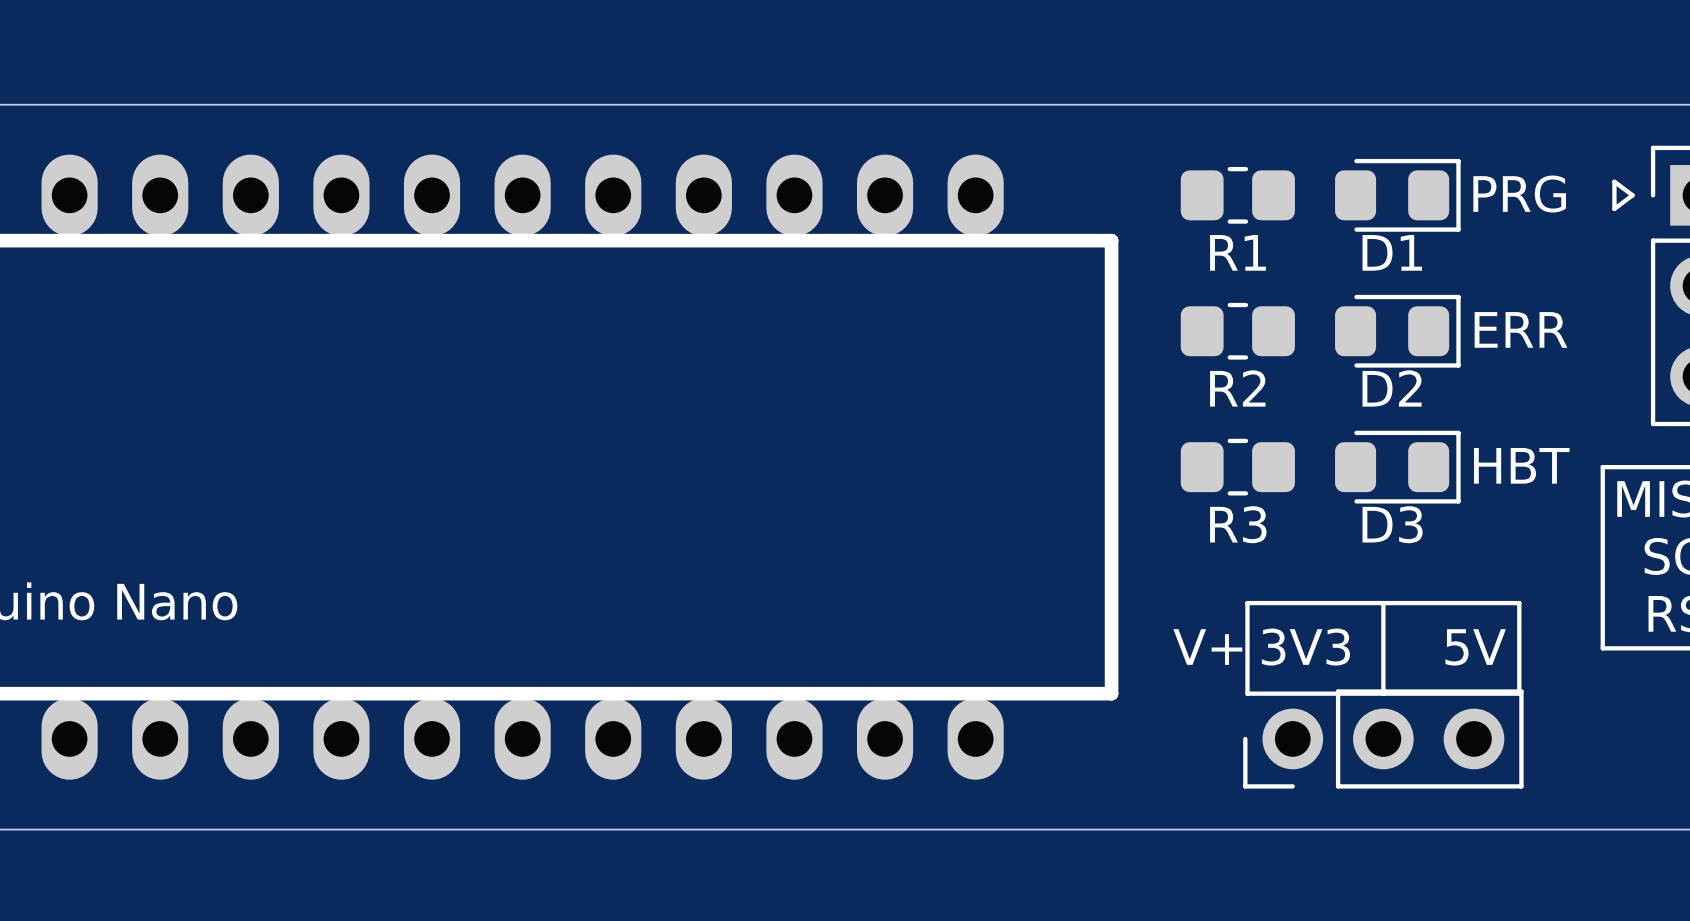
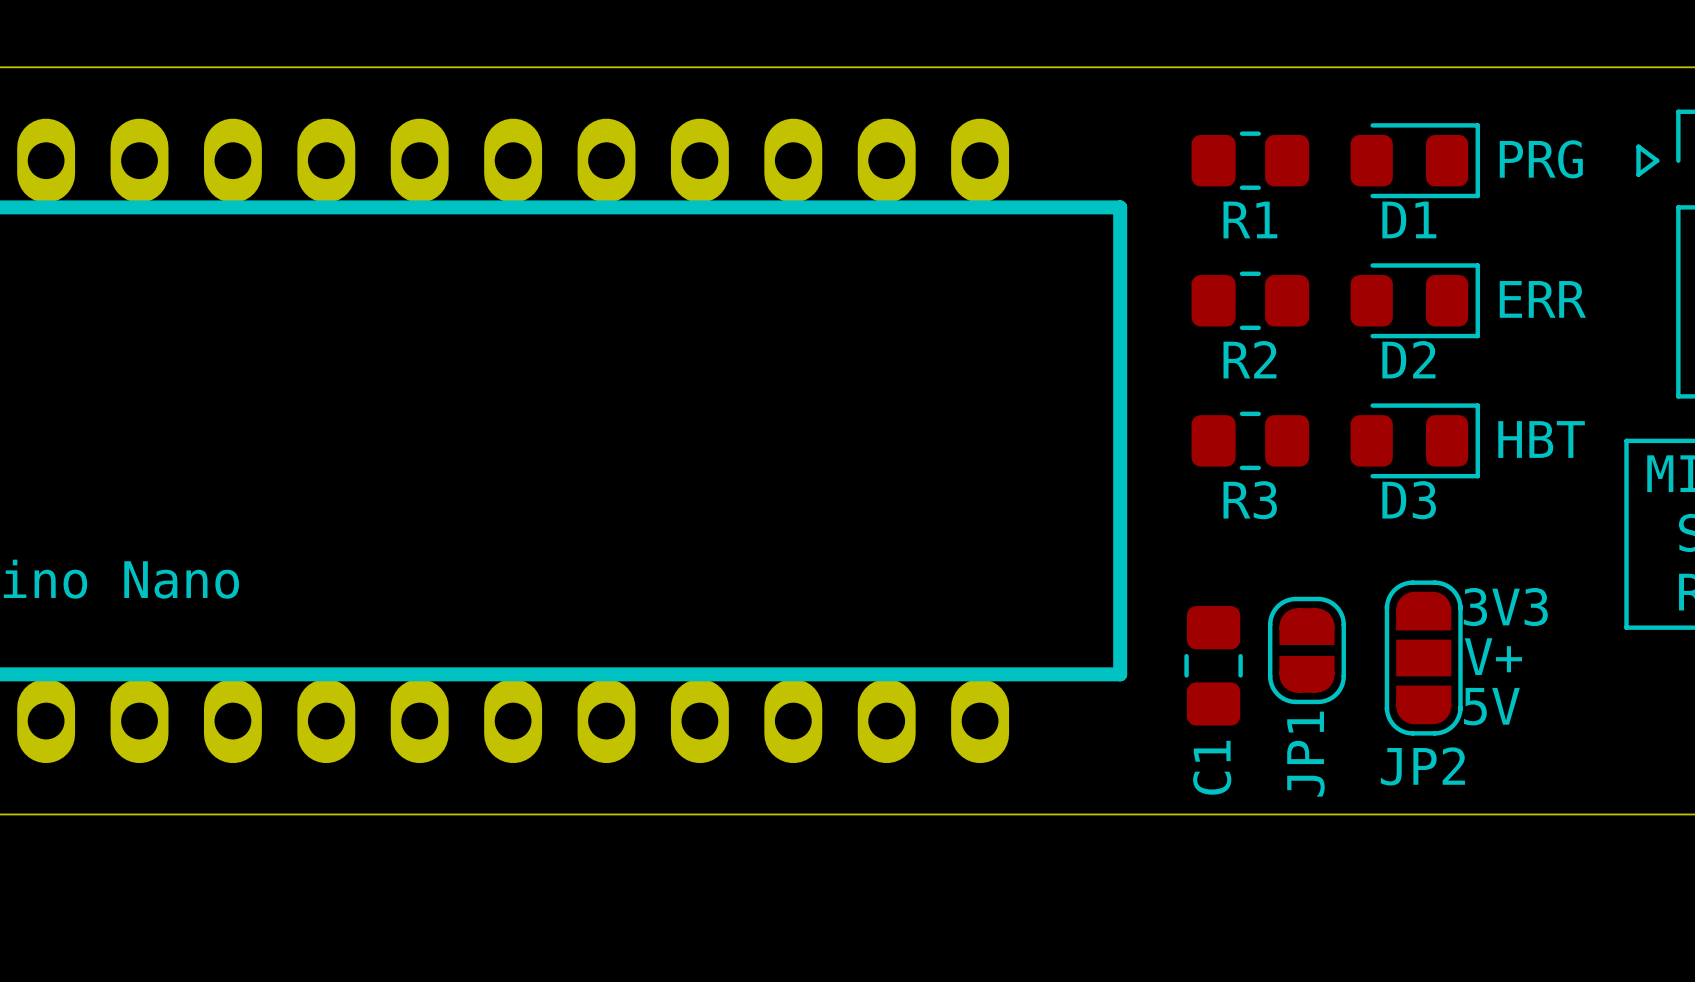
line: (1247, 603) (1519, 603) (1519, 693) (1247, 693) (1247, 603) -> none
line: (1383, 603) (1383, 693) -> none
text position: V+ (1207, 647) -> V+ (1493, 656)
text position: 3V3 (1305, 647) -> 3V3 (1505, 607)
text position: 5V (1475, 647) -> 5V (1491, 706)
JP1: none -> (1306, 650)
JP2: none -> (1423, 658)
C1: none -> (1213, 665)
part: (1383, 738) -> none

